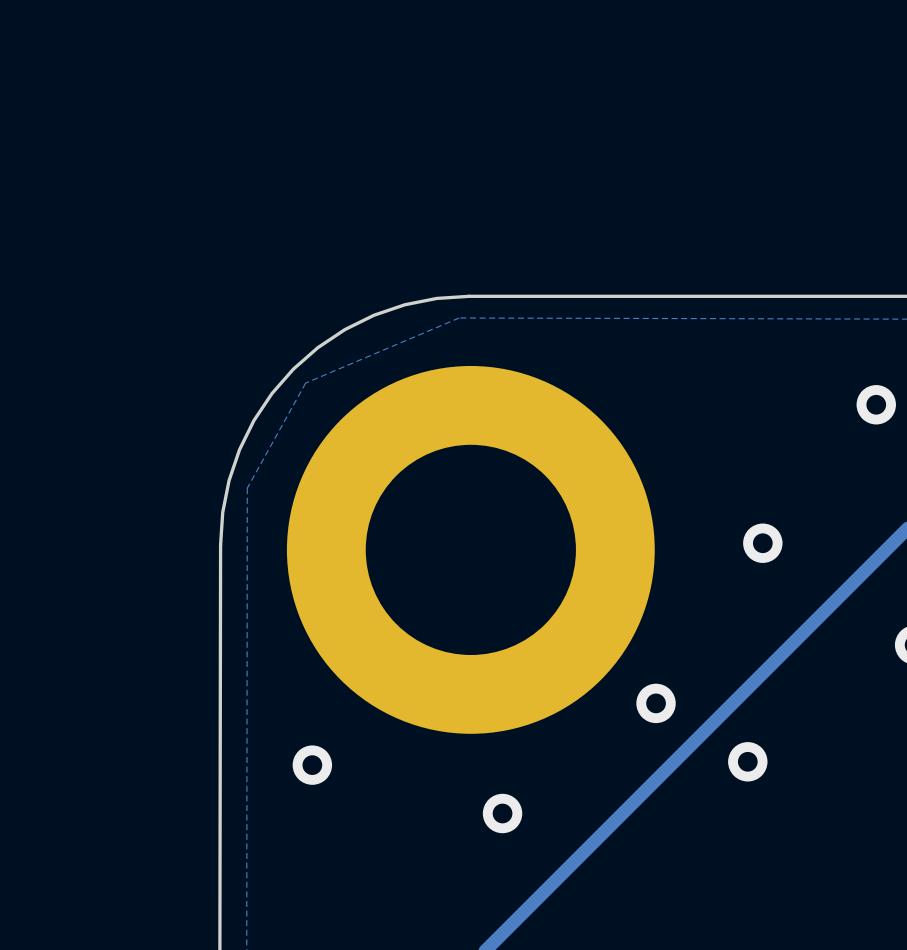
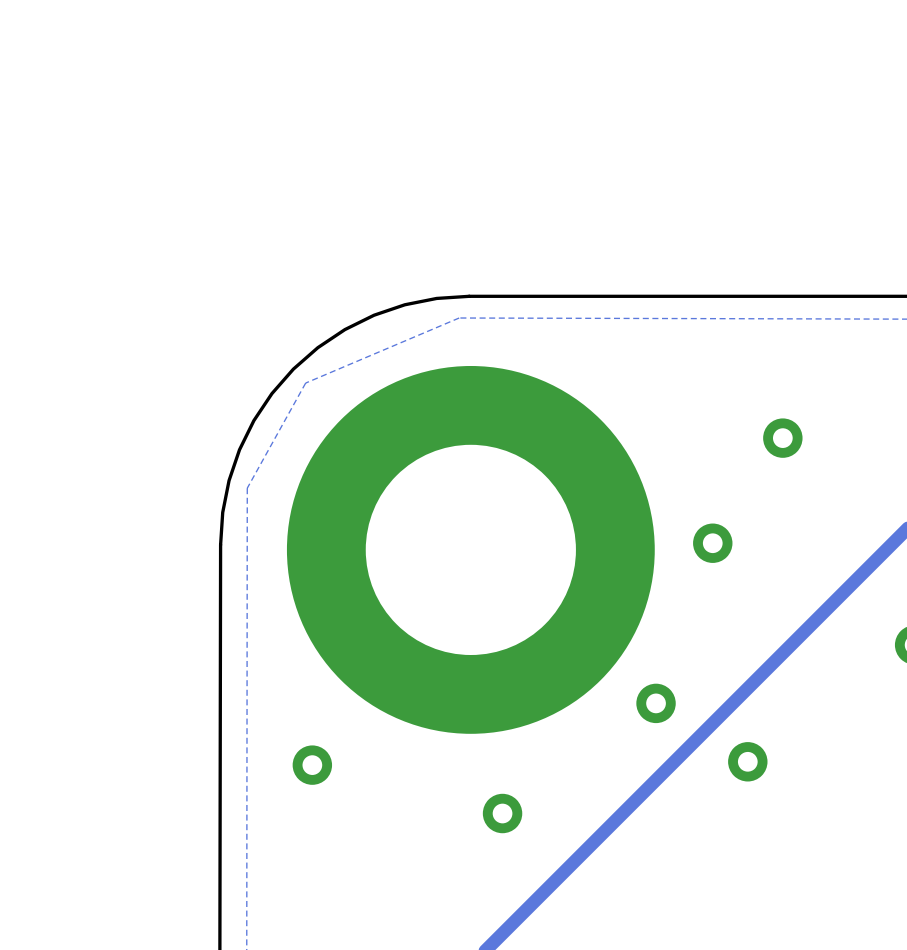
via: (876, 404) -> none
via: none -> (782, 438)
via position: (762, 543) -> (712, 543)

